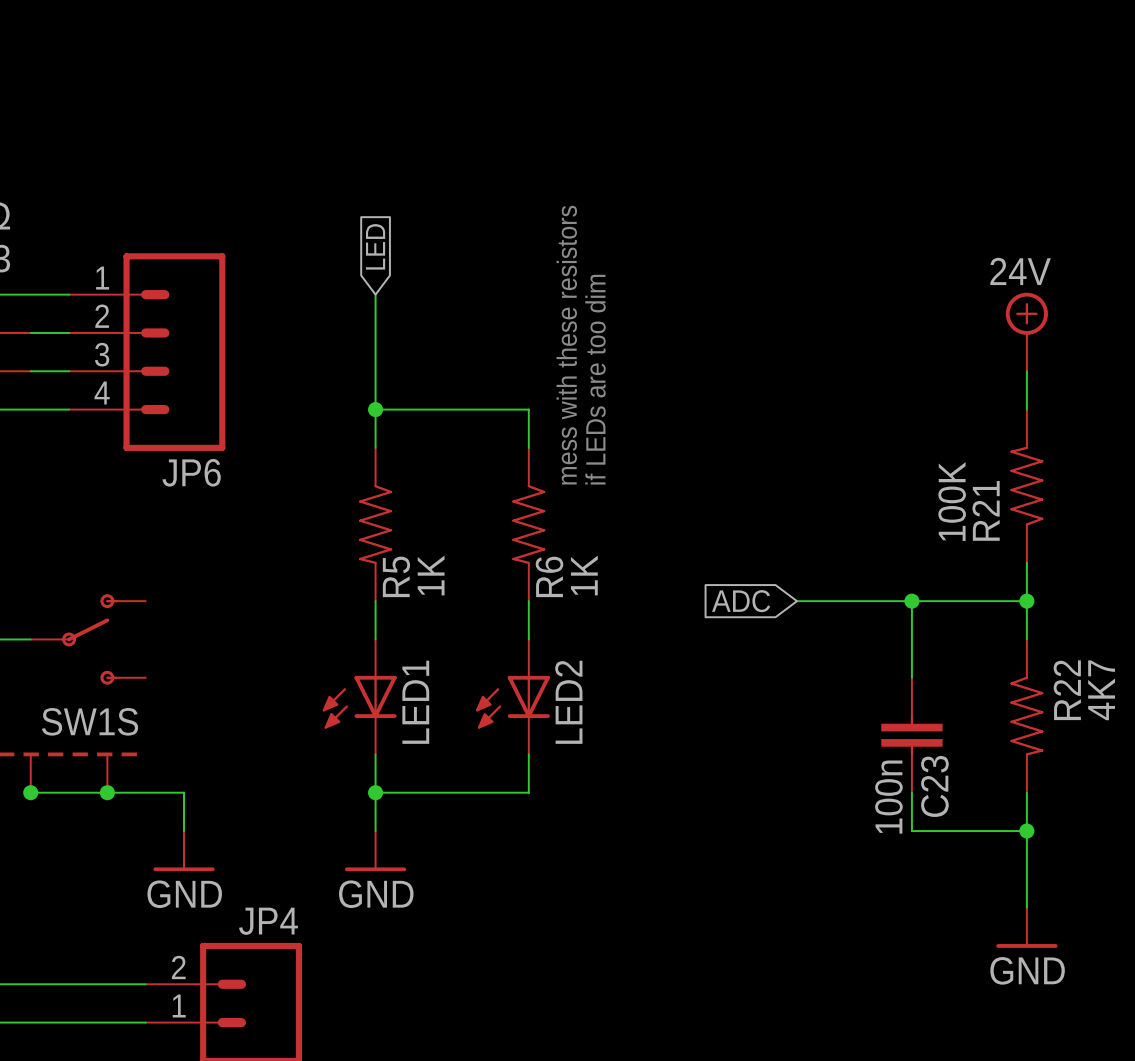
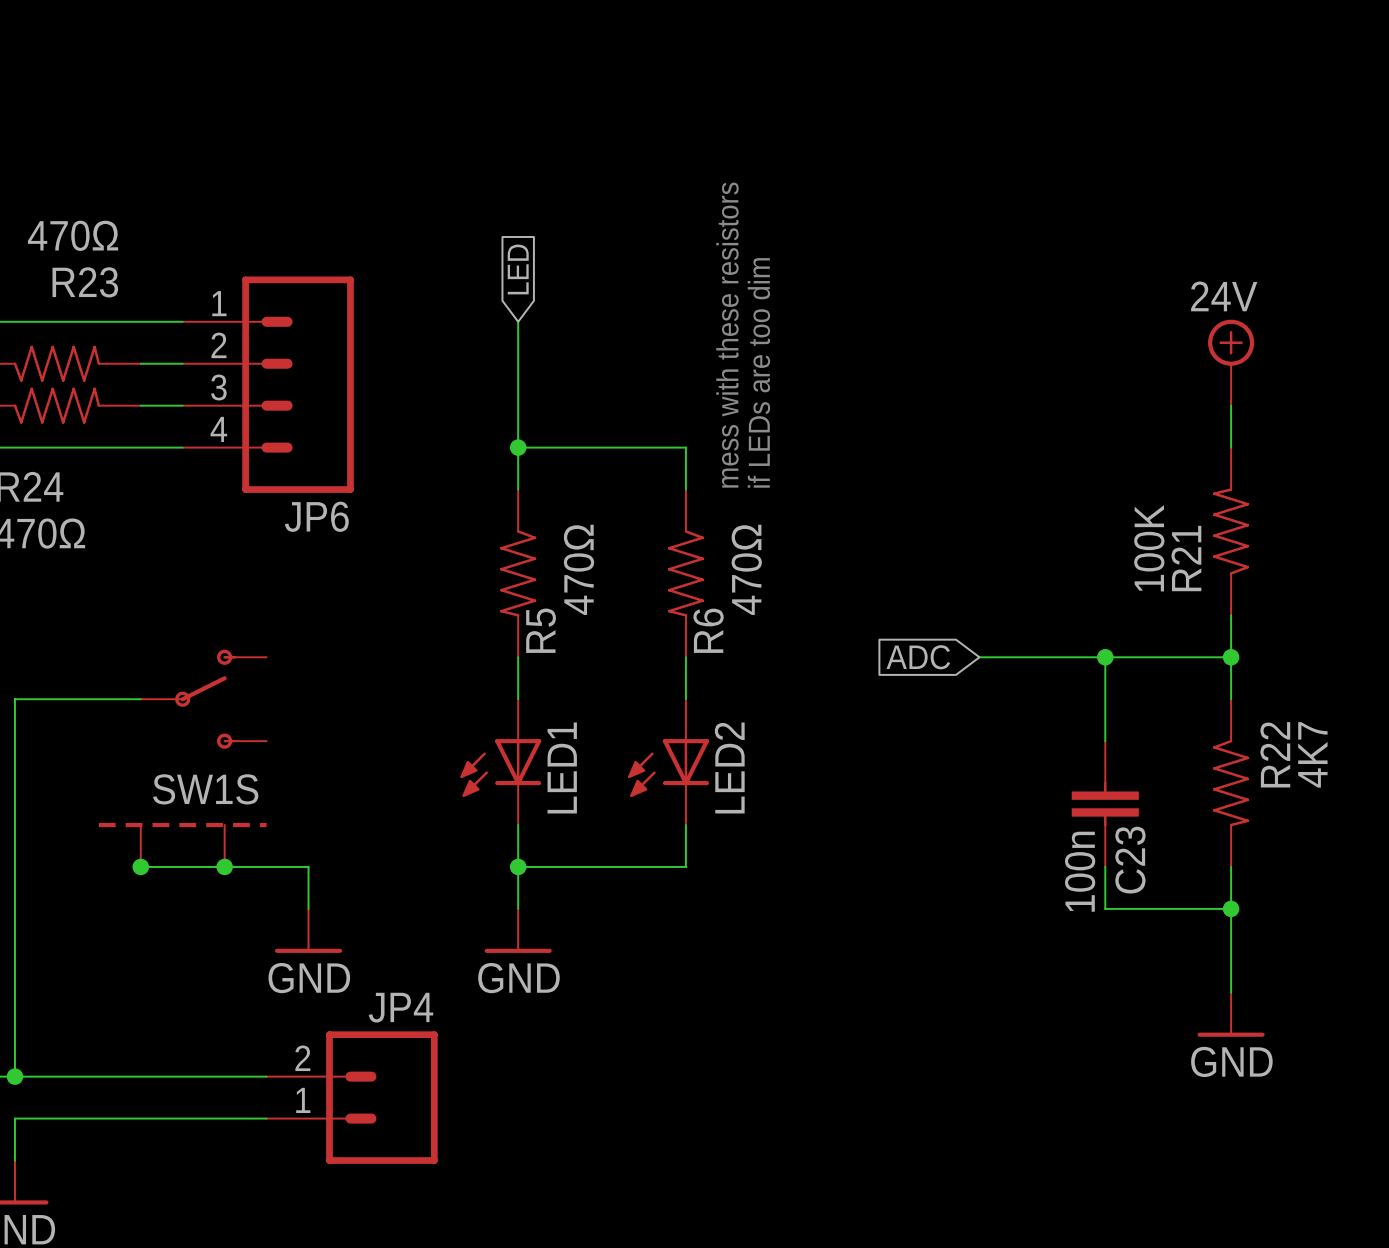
text position: mess with these resistors (566, 345) -> mess with these resistors (727, 335)
text position: if LEDs are too dim (595, 379) -> if LEDs are too dim (758, 372)
R5 value: 1K (431, 575) -> 470Ω (578, 569)
R6 value: 1K (584, 575) -> 470Ω (746, 569)

